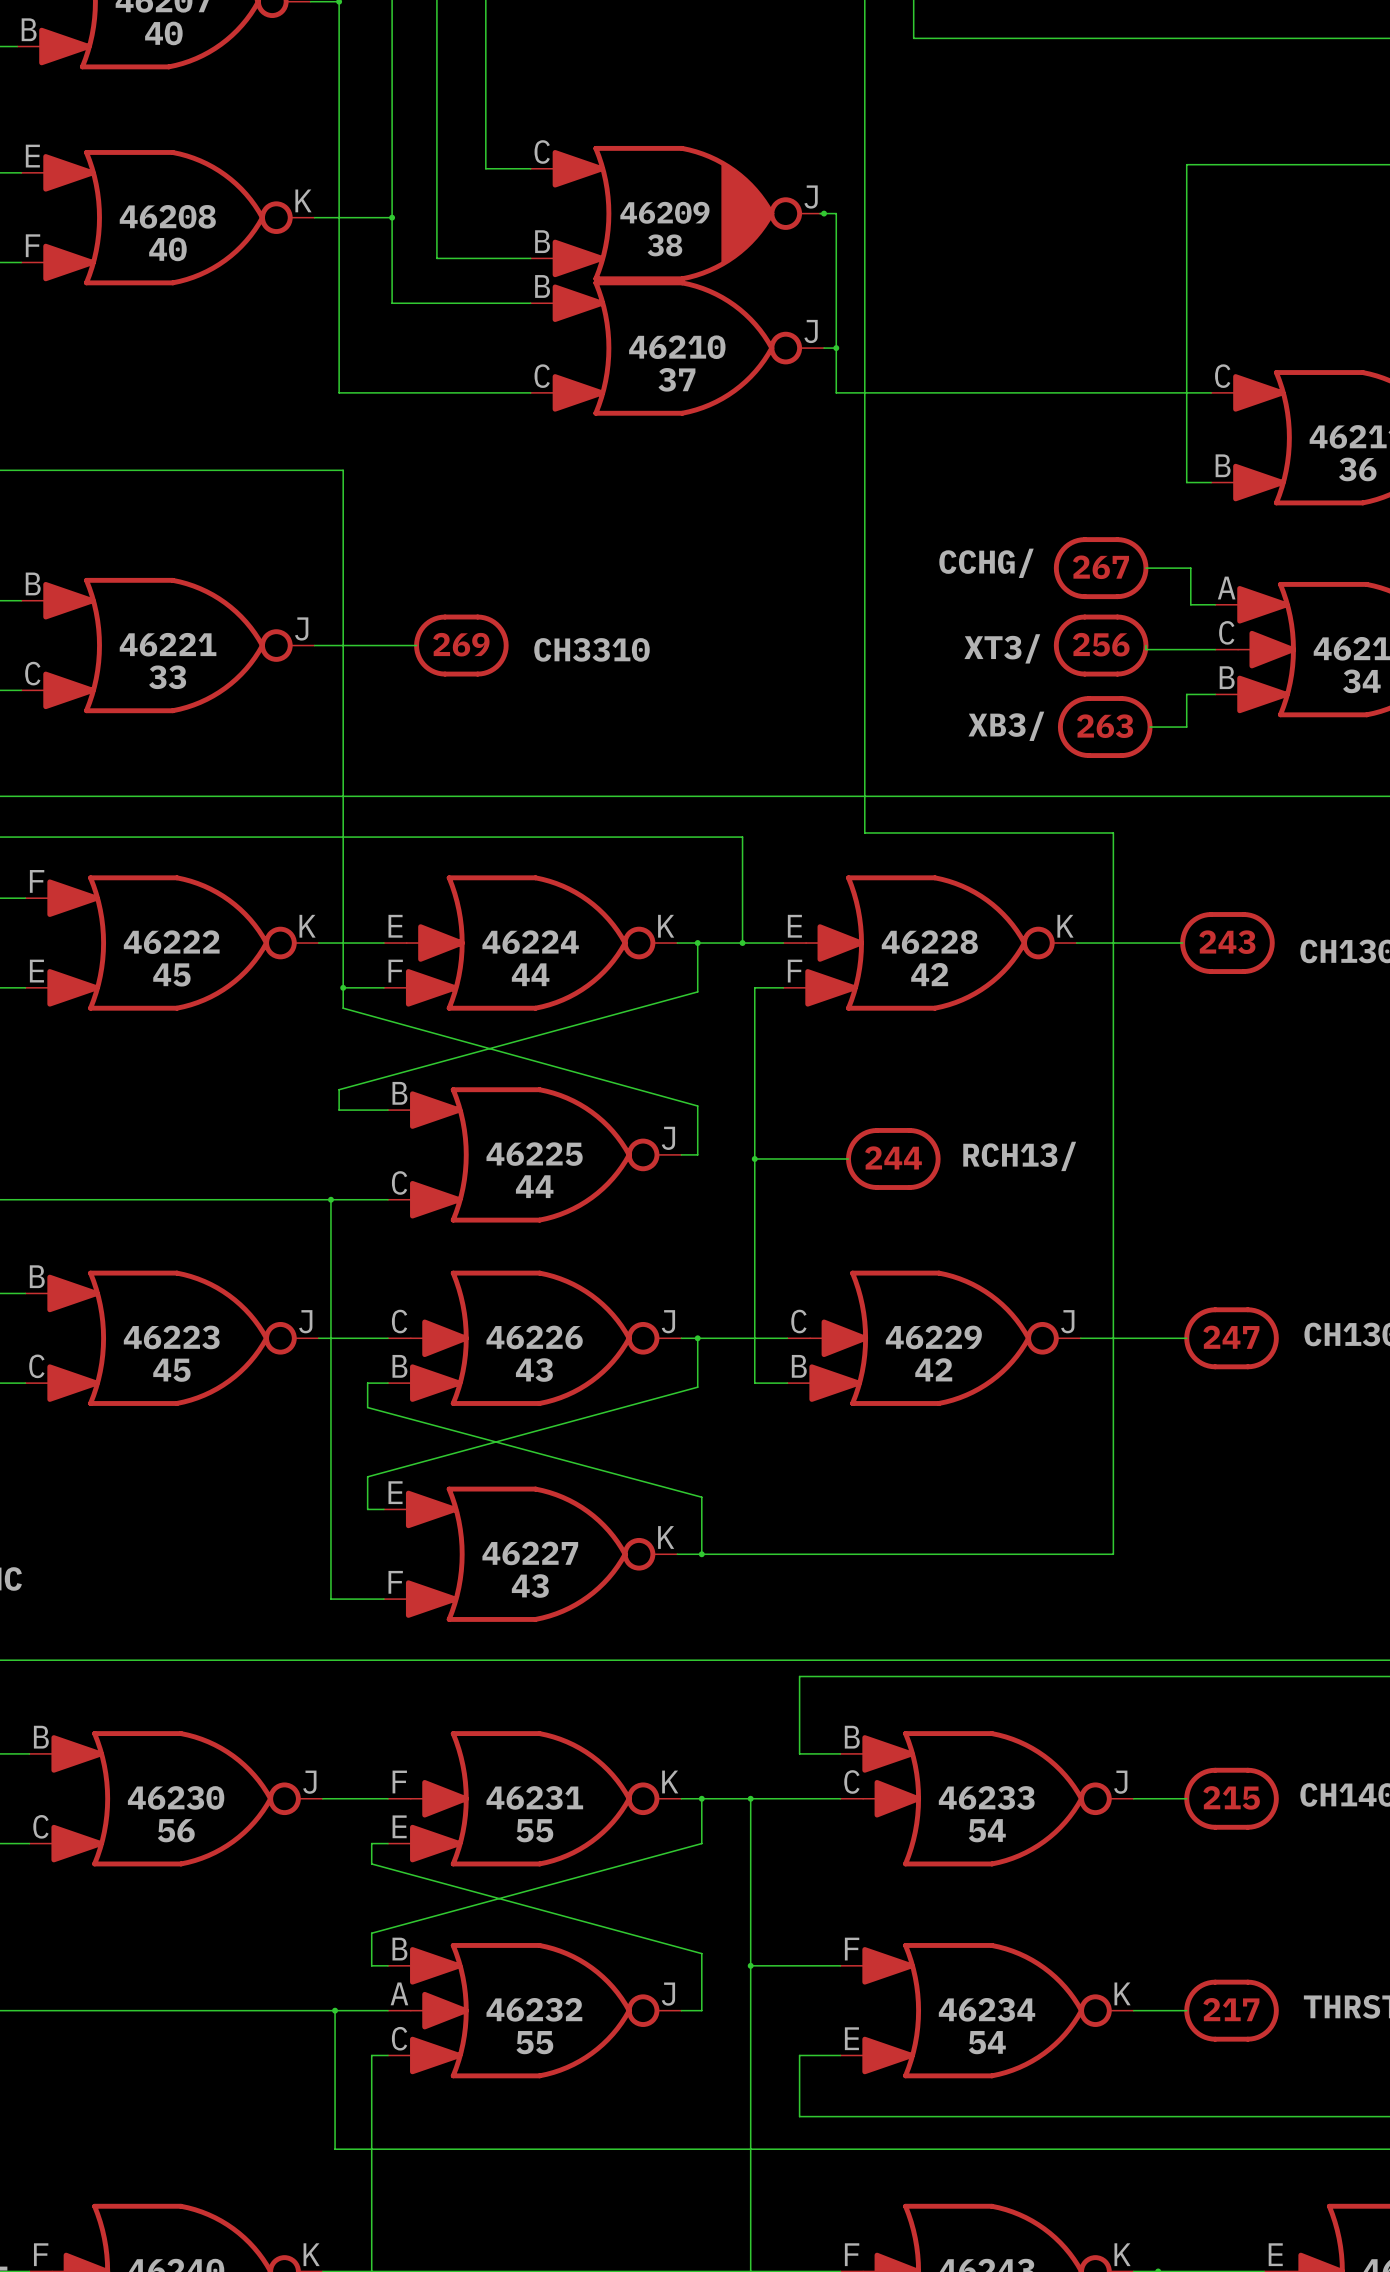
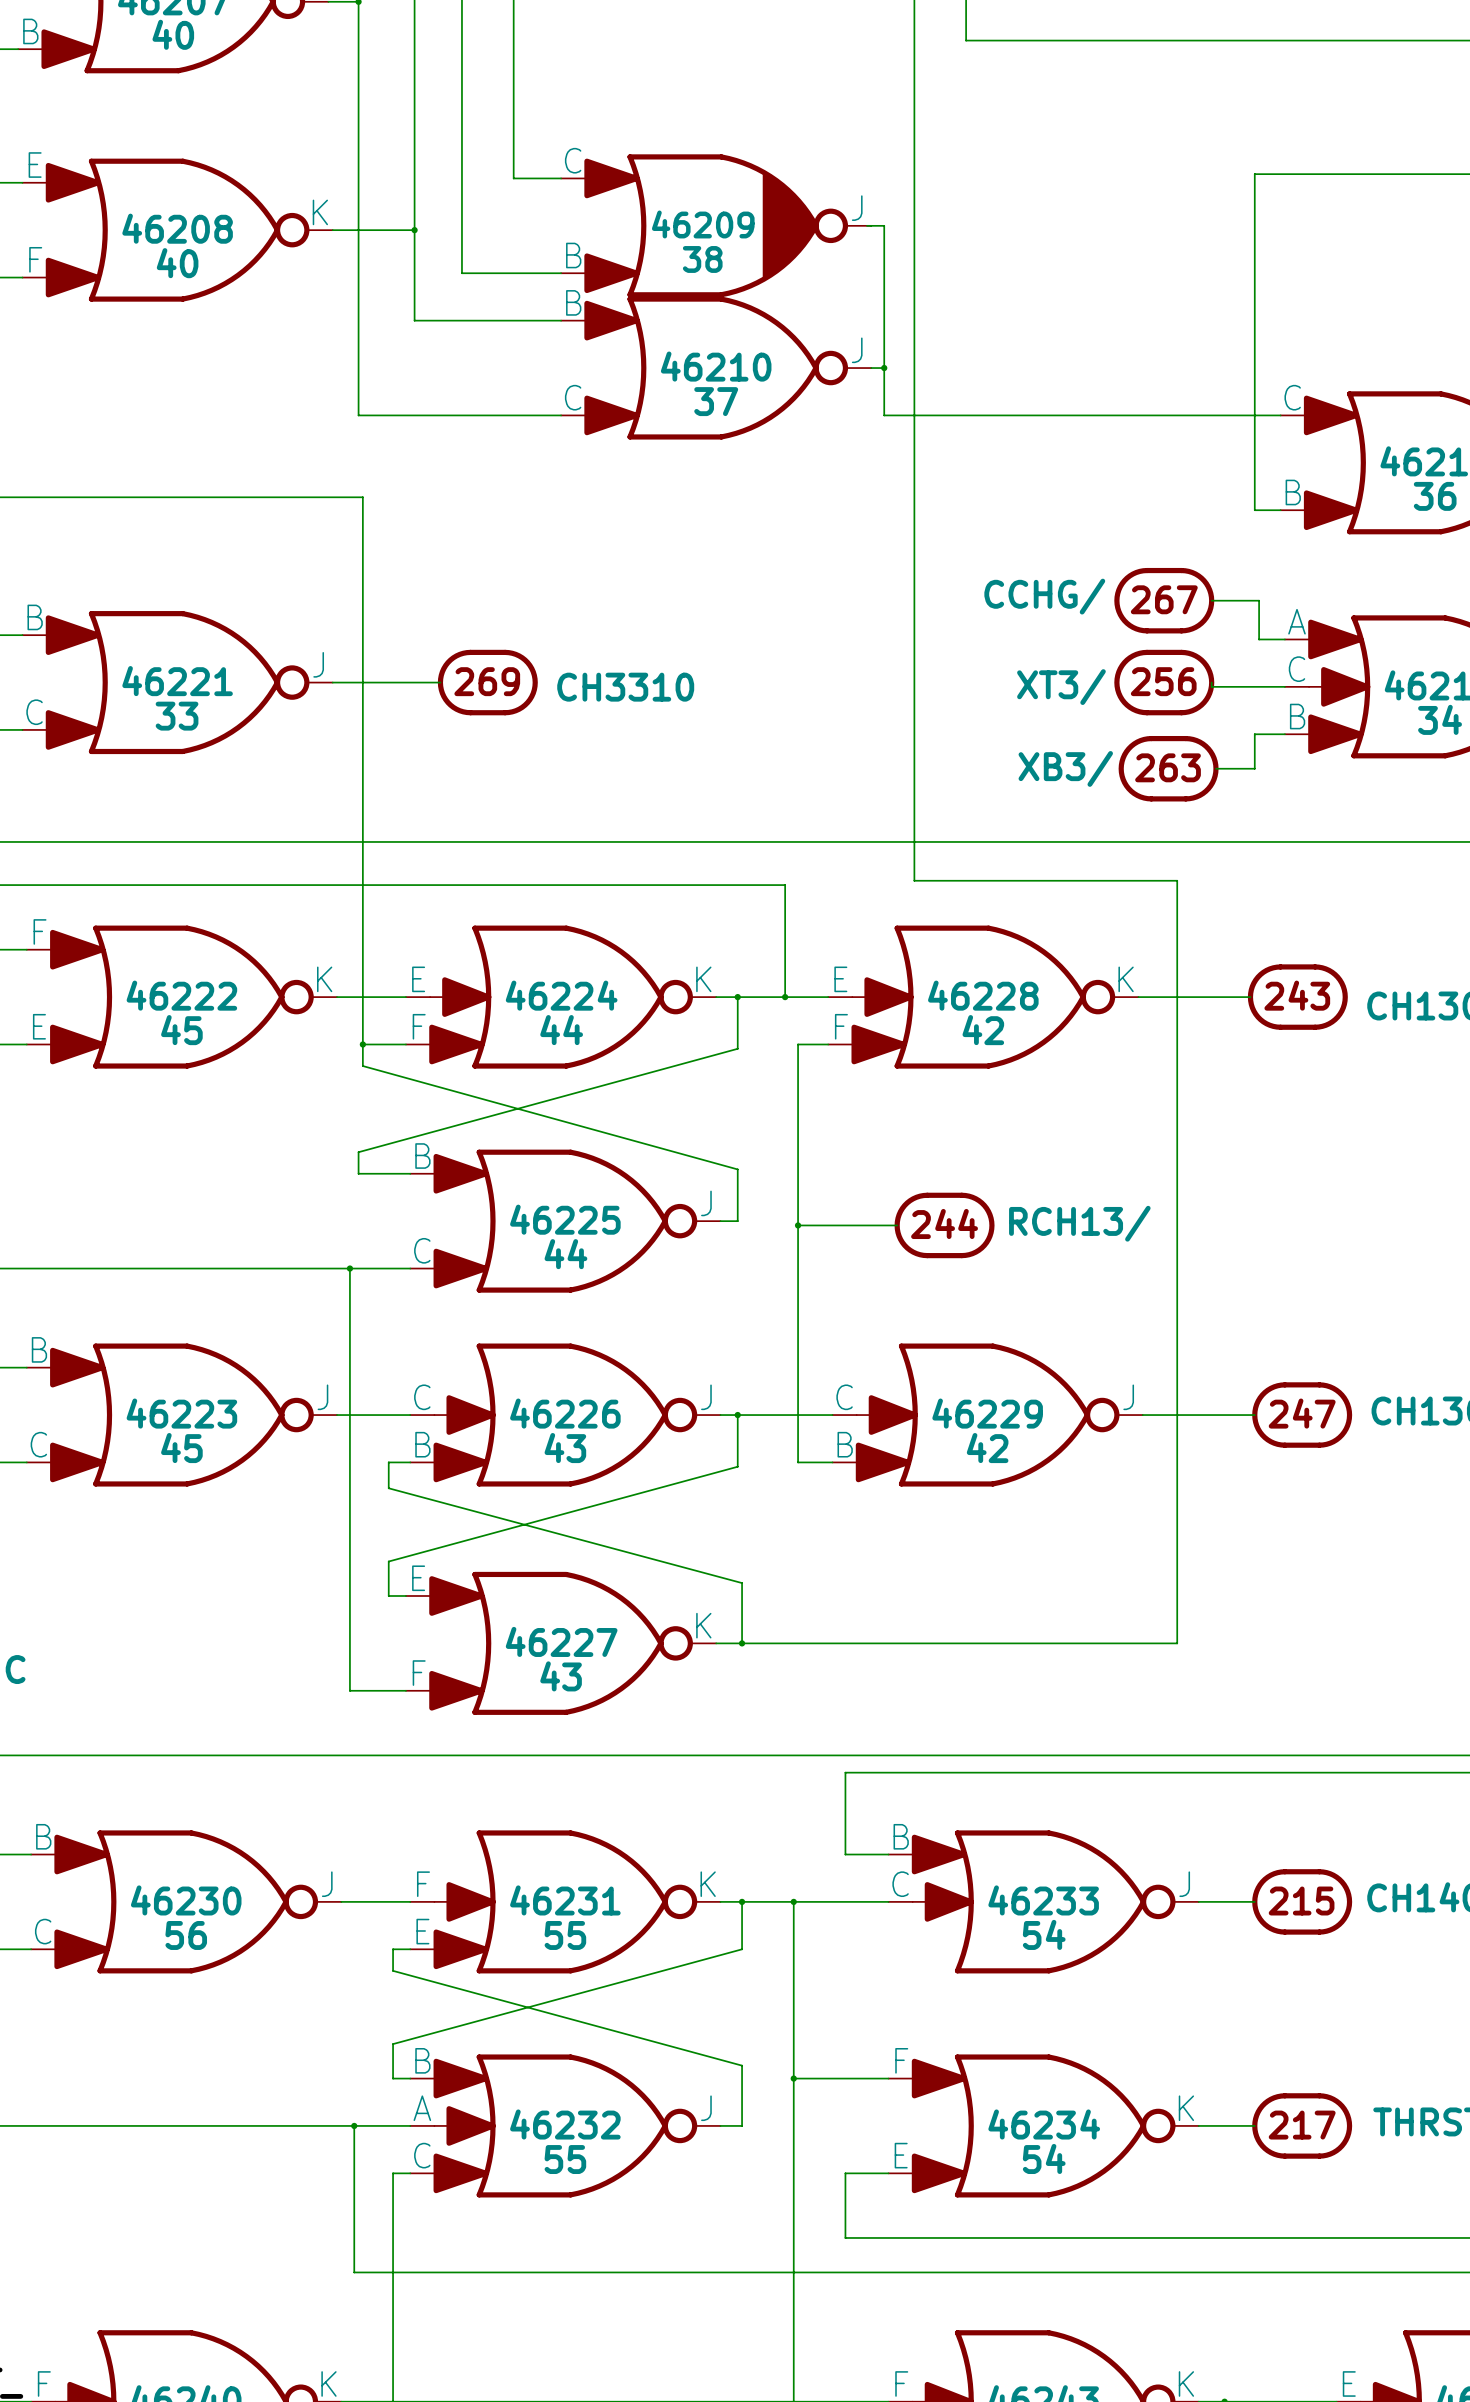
junction: (824, 213) -> none

